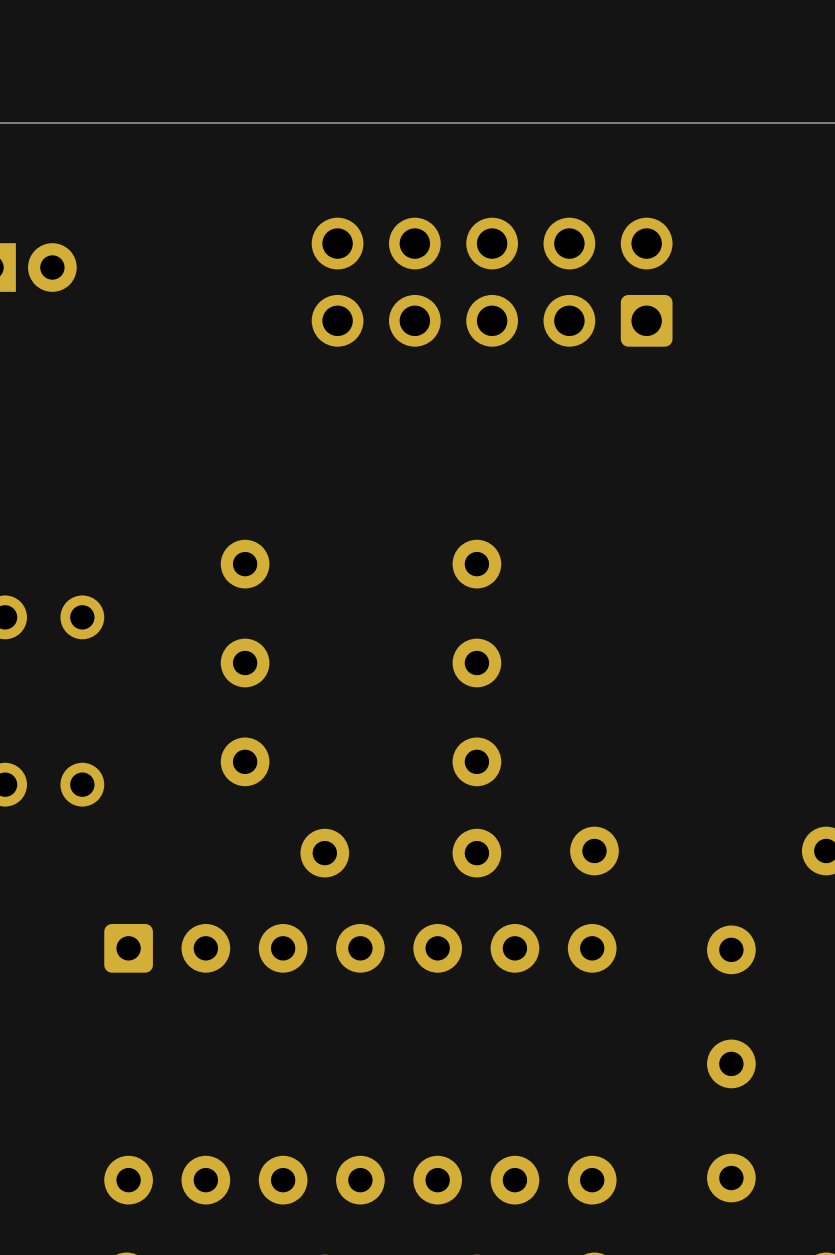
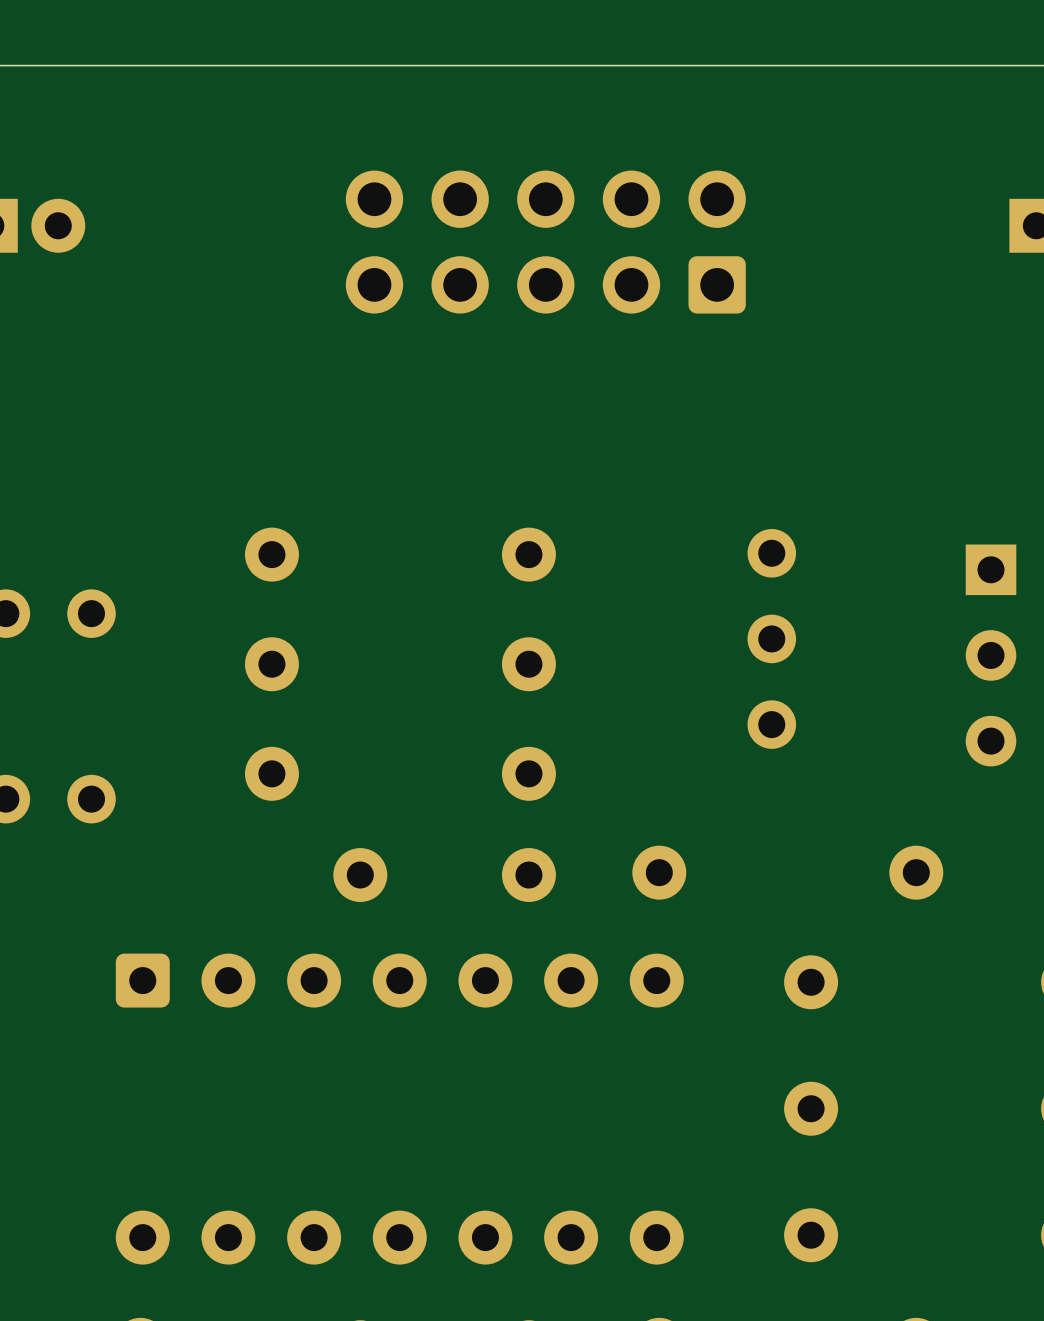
part: none -> (771, 638)

